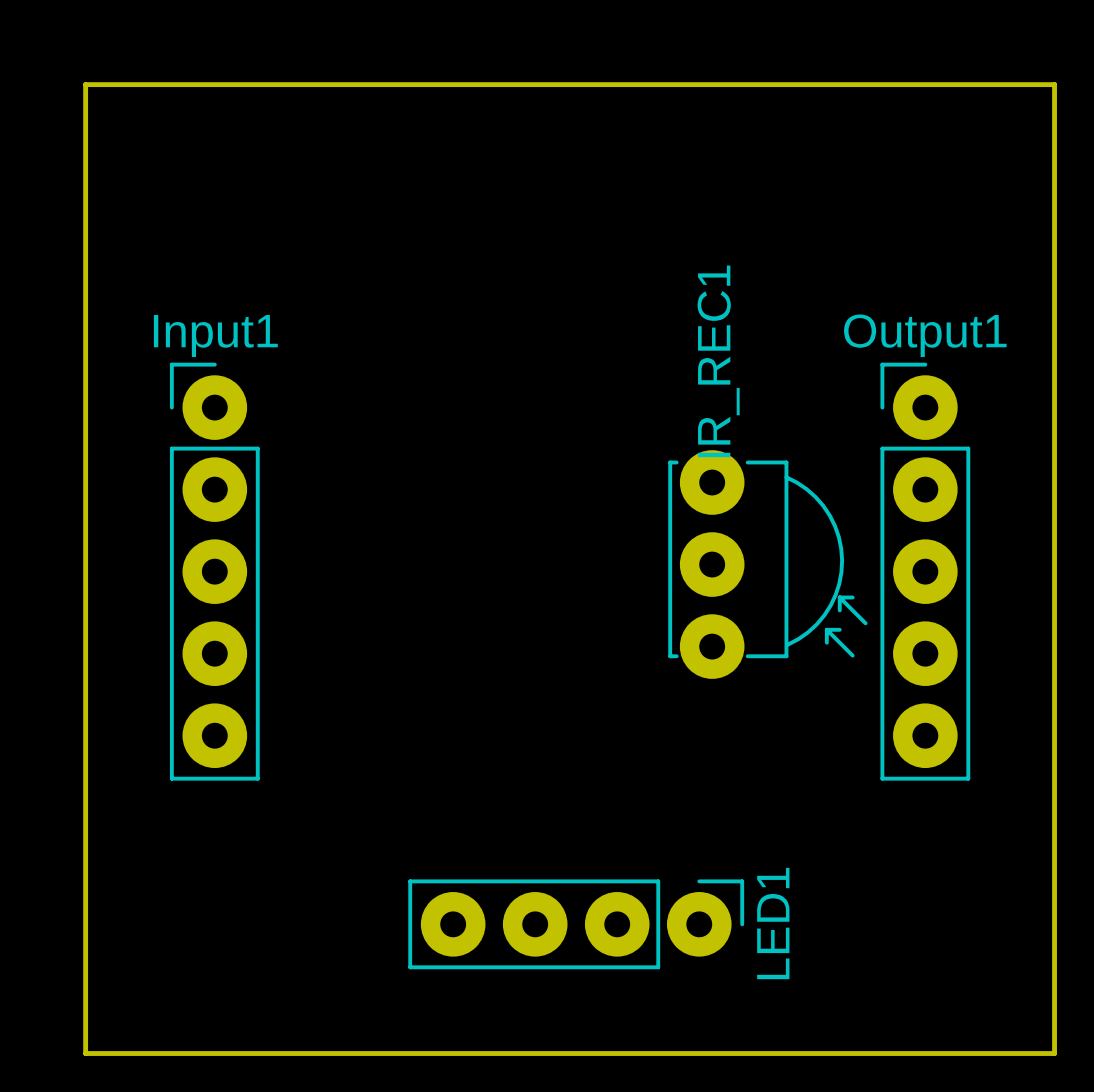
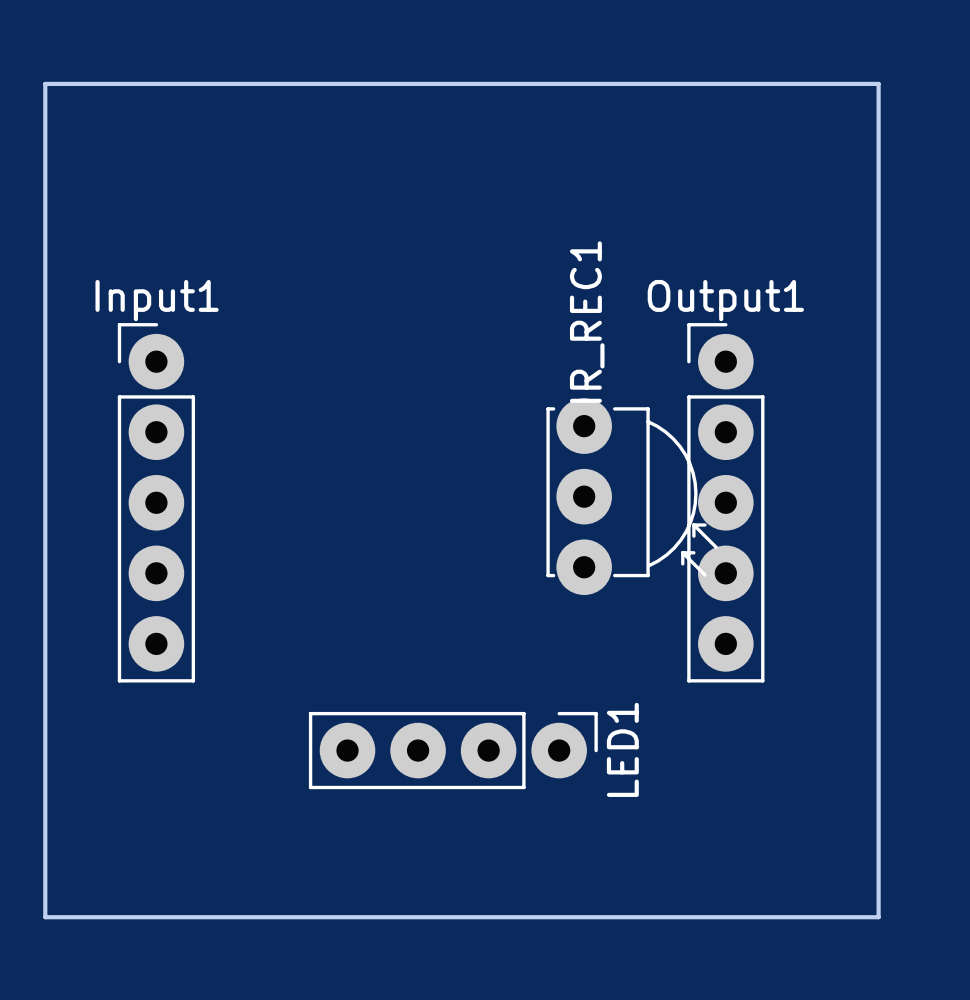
Output1 position: (925, 571) -> (725, 502)
LED1 position: (576, 924) -> (453, 750)

